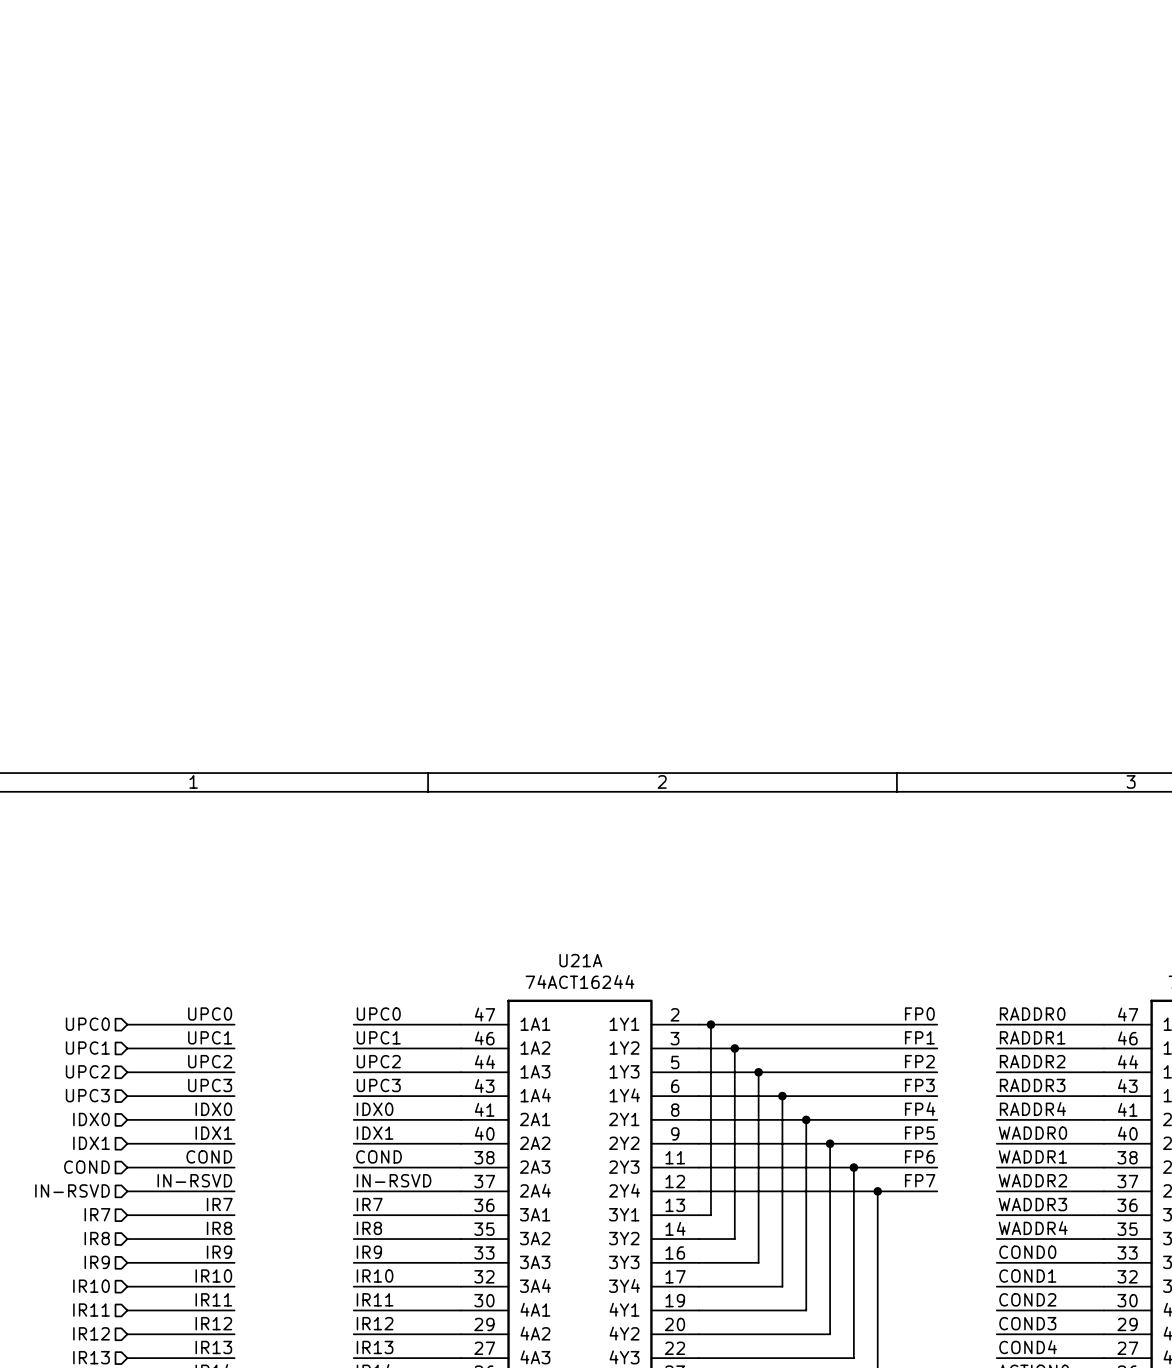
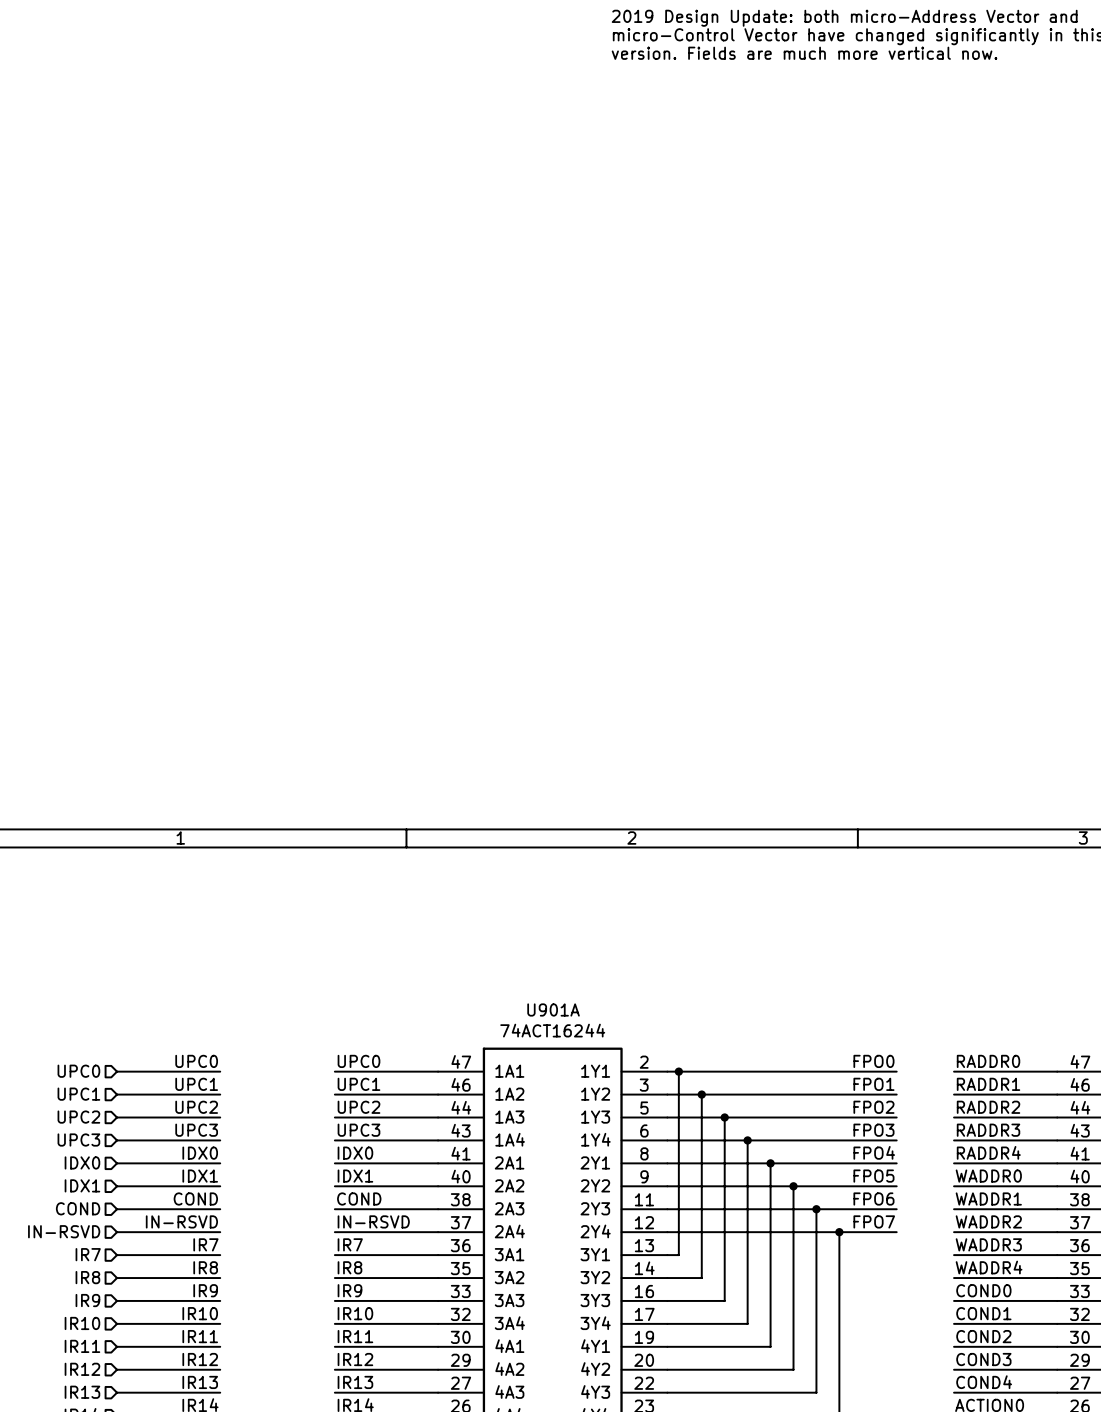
U21A name: U21A (580, 960) -> U901A (553, 1009)
label: FP0 (919, 1014) -> FPO0 (873, 1061)
label: FP1 (919, 1037) -> FPO1 (873, 1084)
label: FP2 (919, 1061) -> FPO2 (873, 1107)
label: FP3 (919, 1085) -> FPO3 (873, 1130)
label: FP4 (920, 1109) -> FPO4 (874, 1152)
label: FP5 (919, 1133) -> FPO5 (873, 1176)
label: FP6 (919, 1156) -> FPO6 (873, 1199)
label: FP7 (920, 1180) -> FPO7 (874, 1221)

